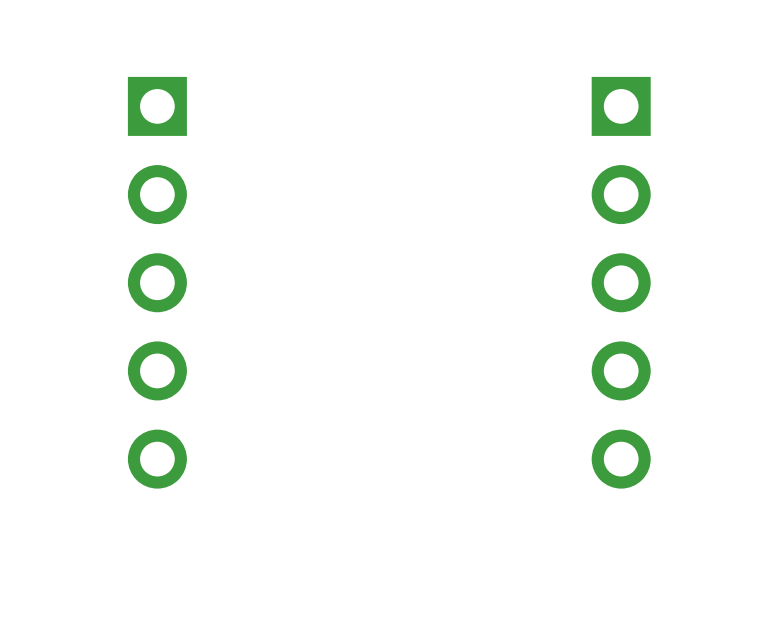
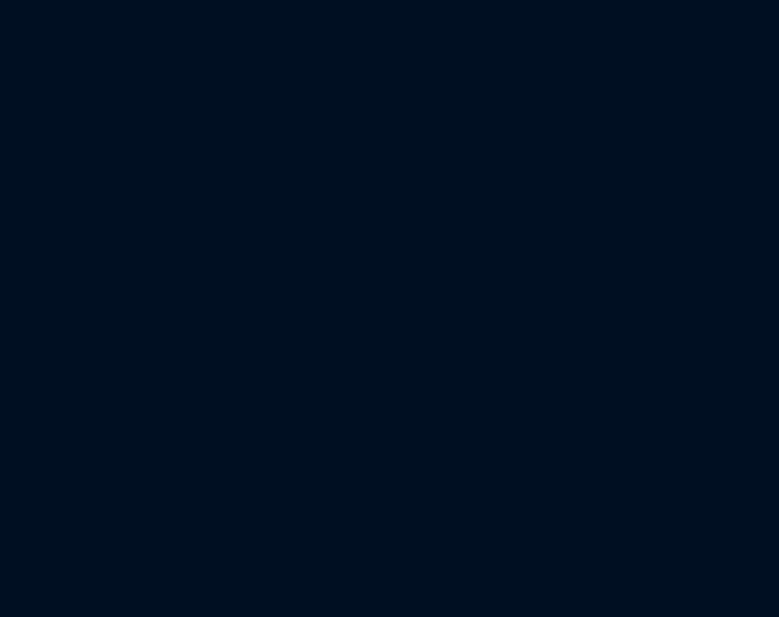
part: (157, 282) -> none
part: (621, 282) -> none

